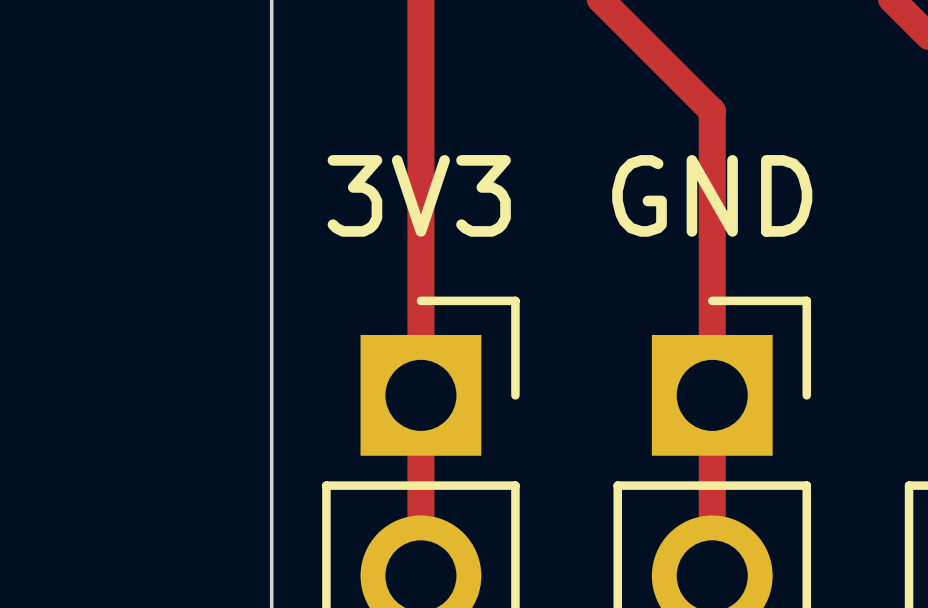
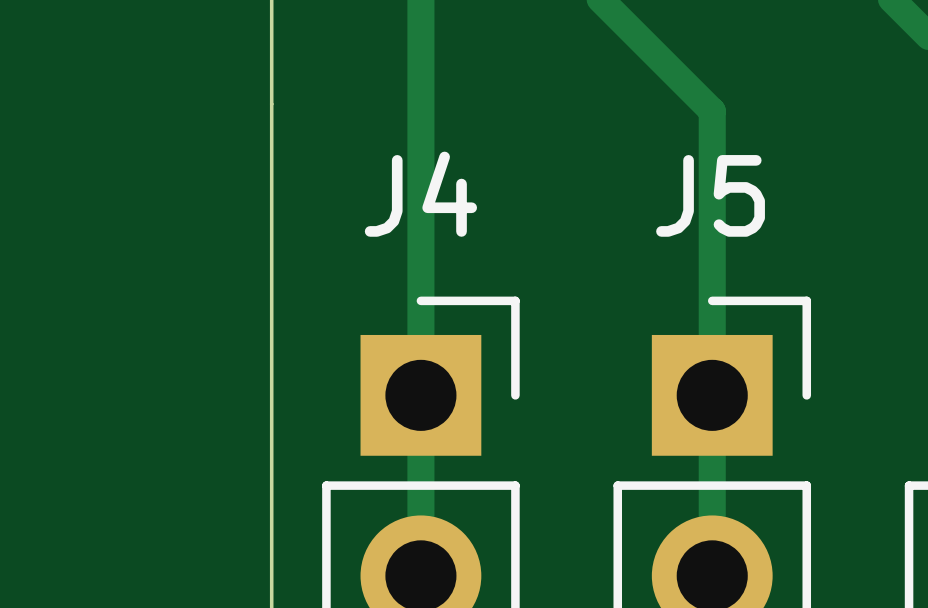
3V3 name: 3V3 (419, 195) -> J4 (420, 194)
GND name: GND (712, 195) -> J5 (710, 195)

